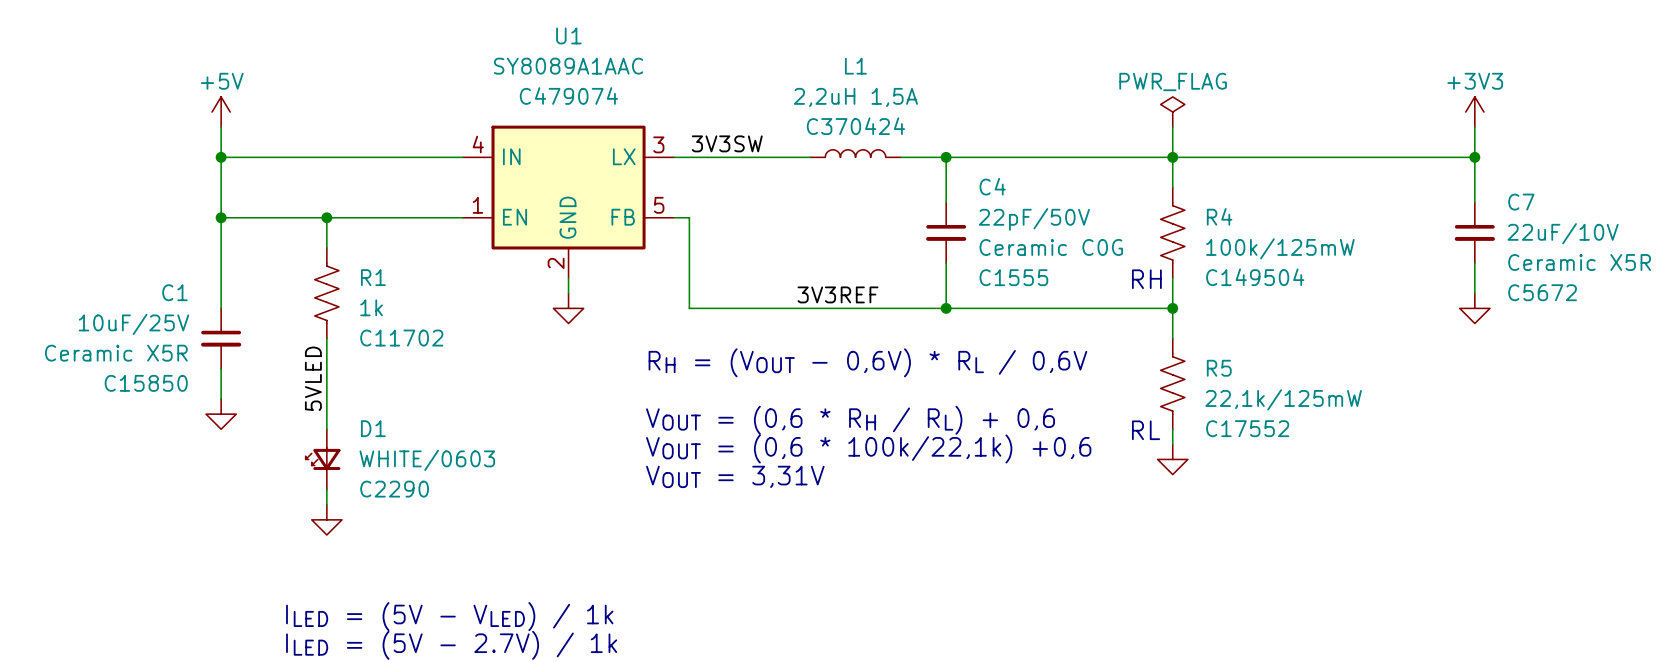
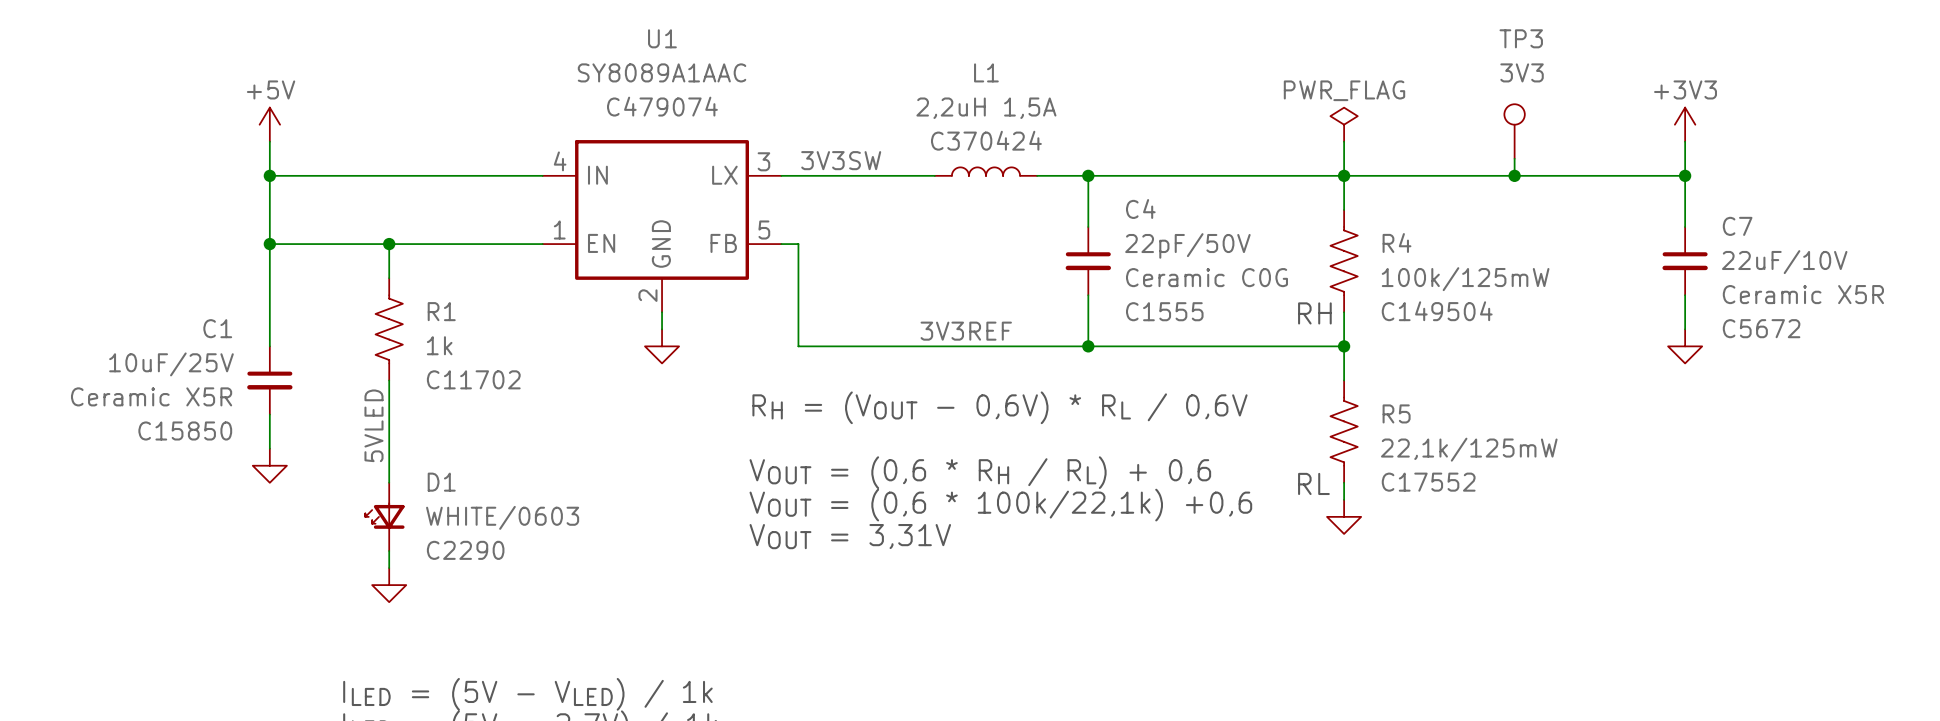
TP3: none -> 3V3 (1514, 131)
wire: none -> (1514, 158) (1514, 175)
junction: none -> (1514, 175)

